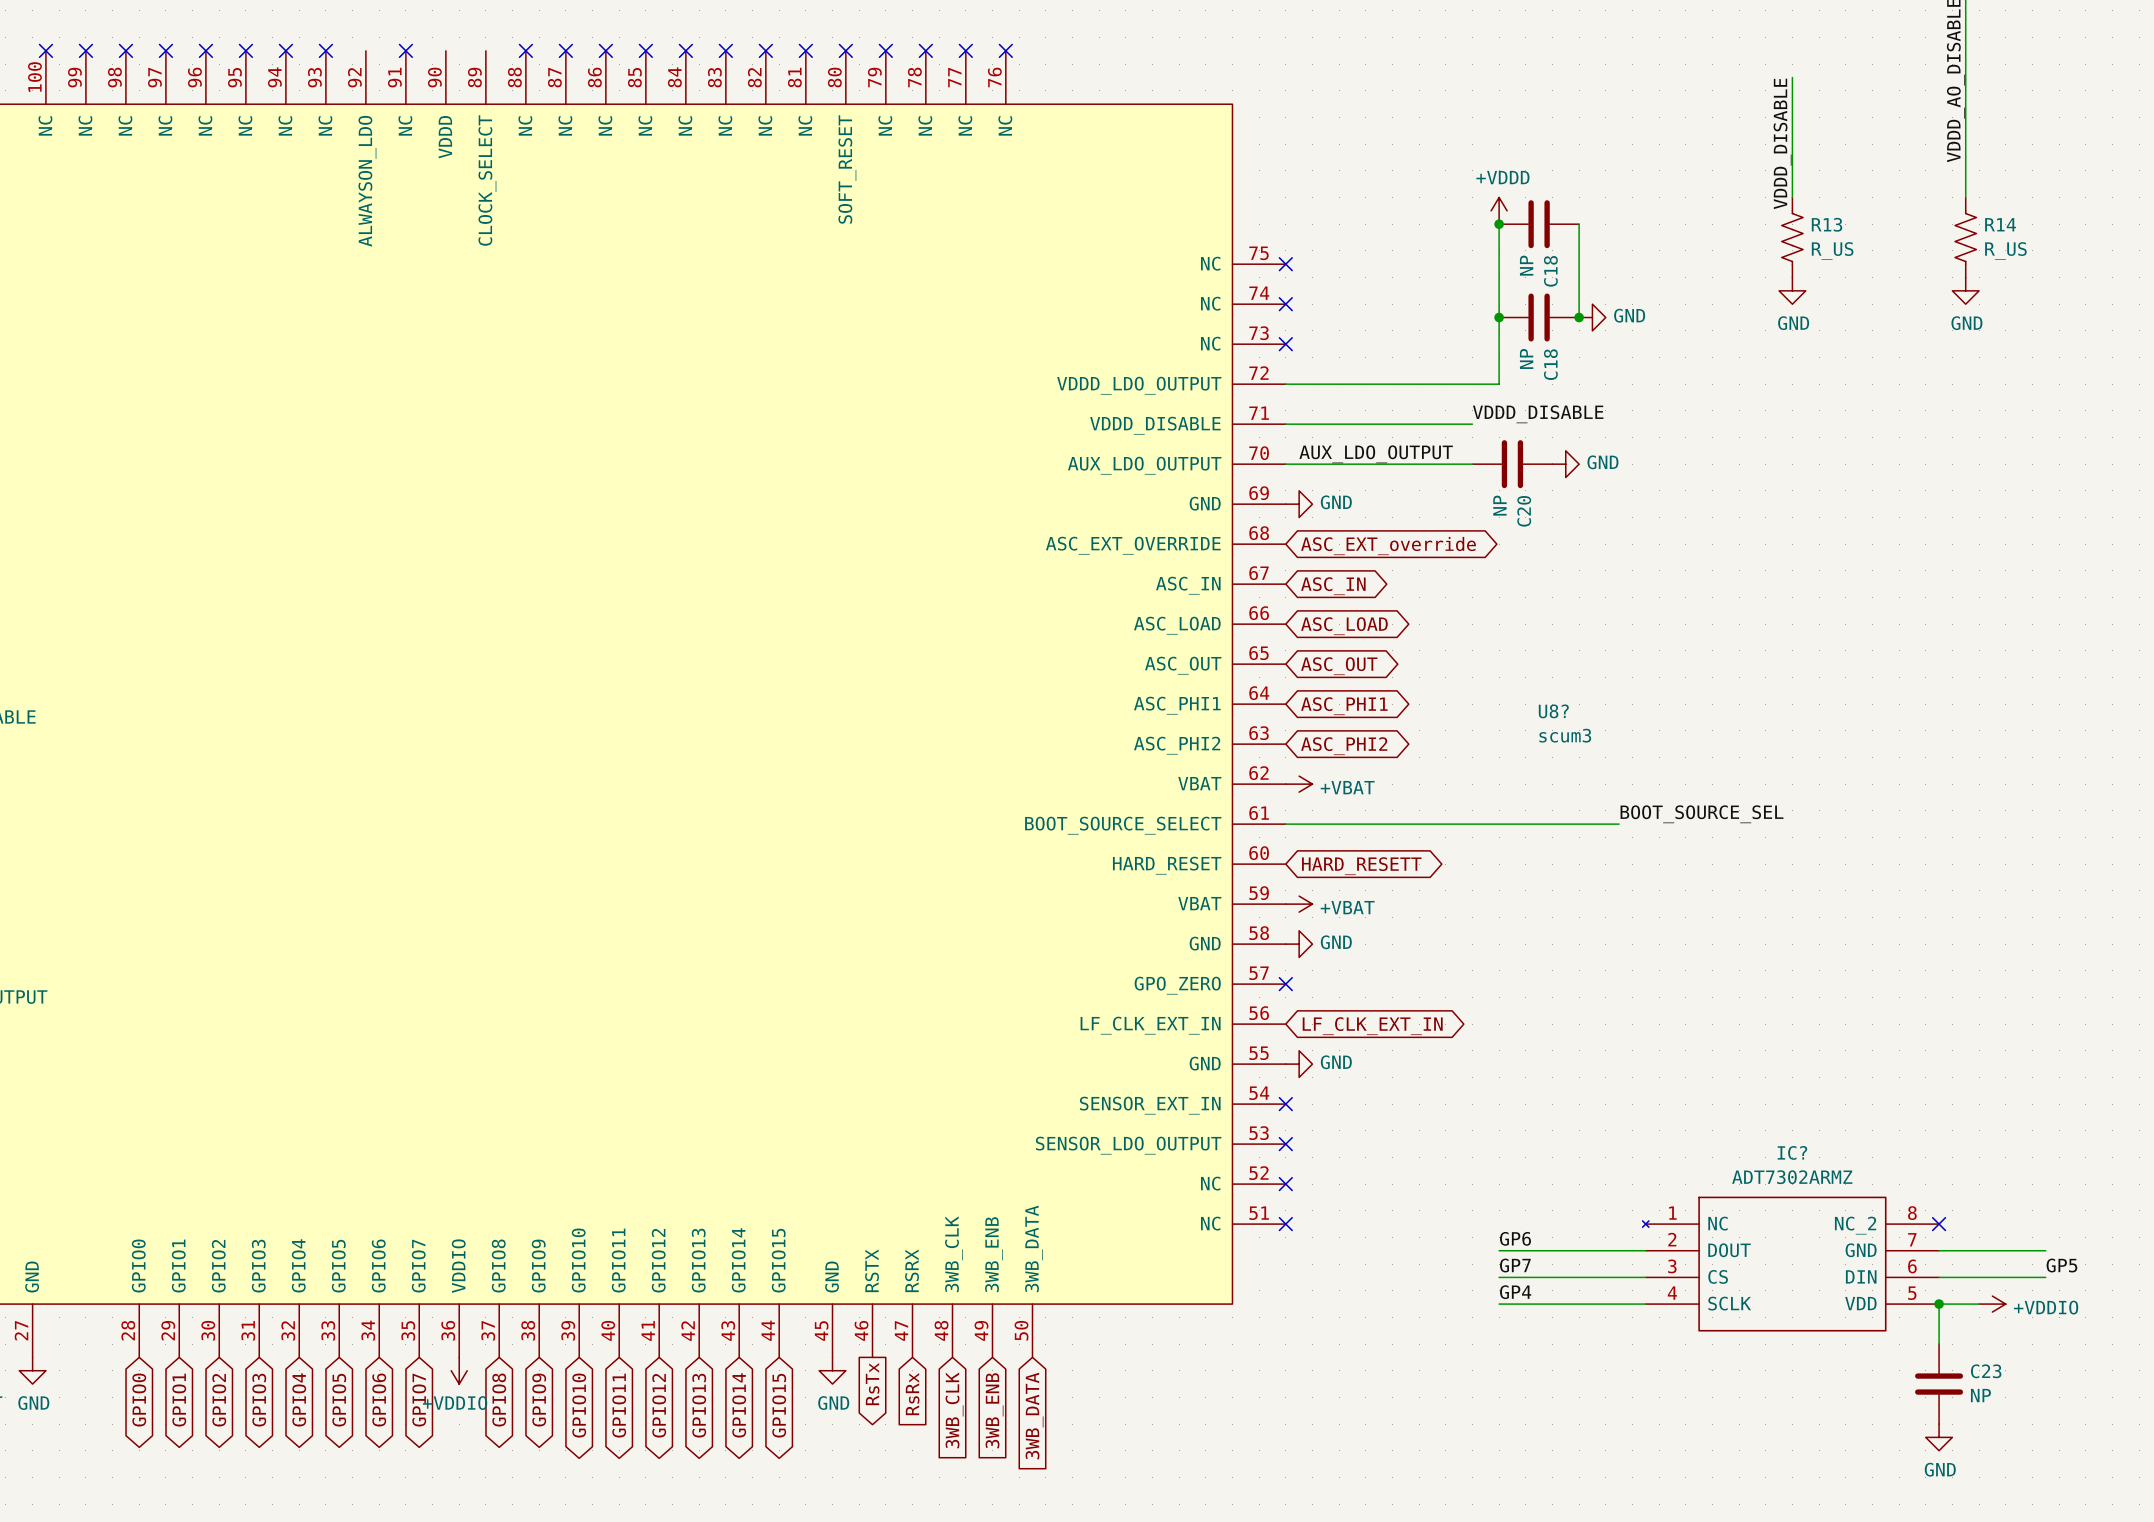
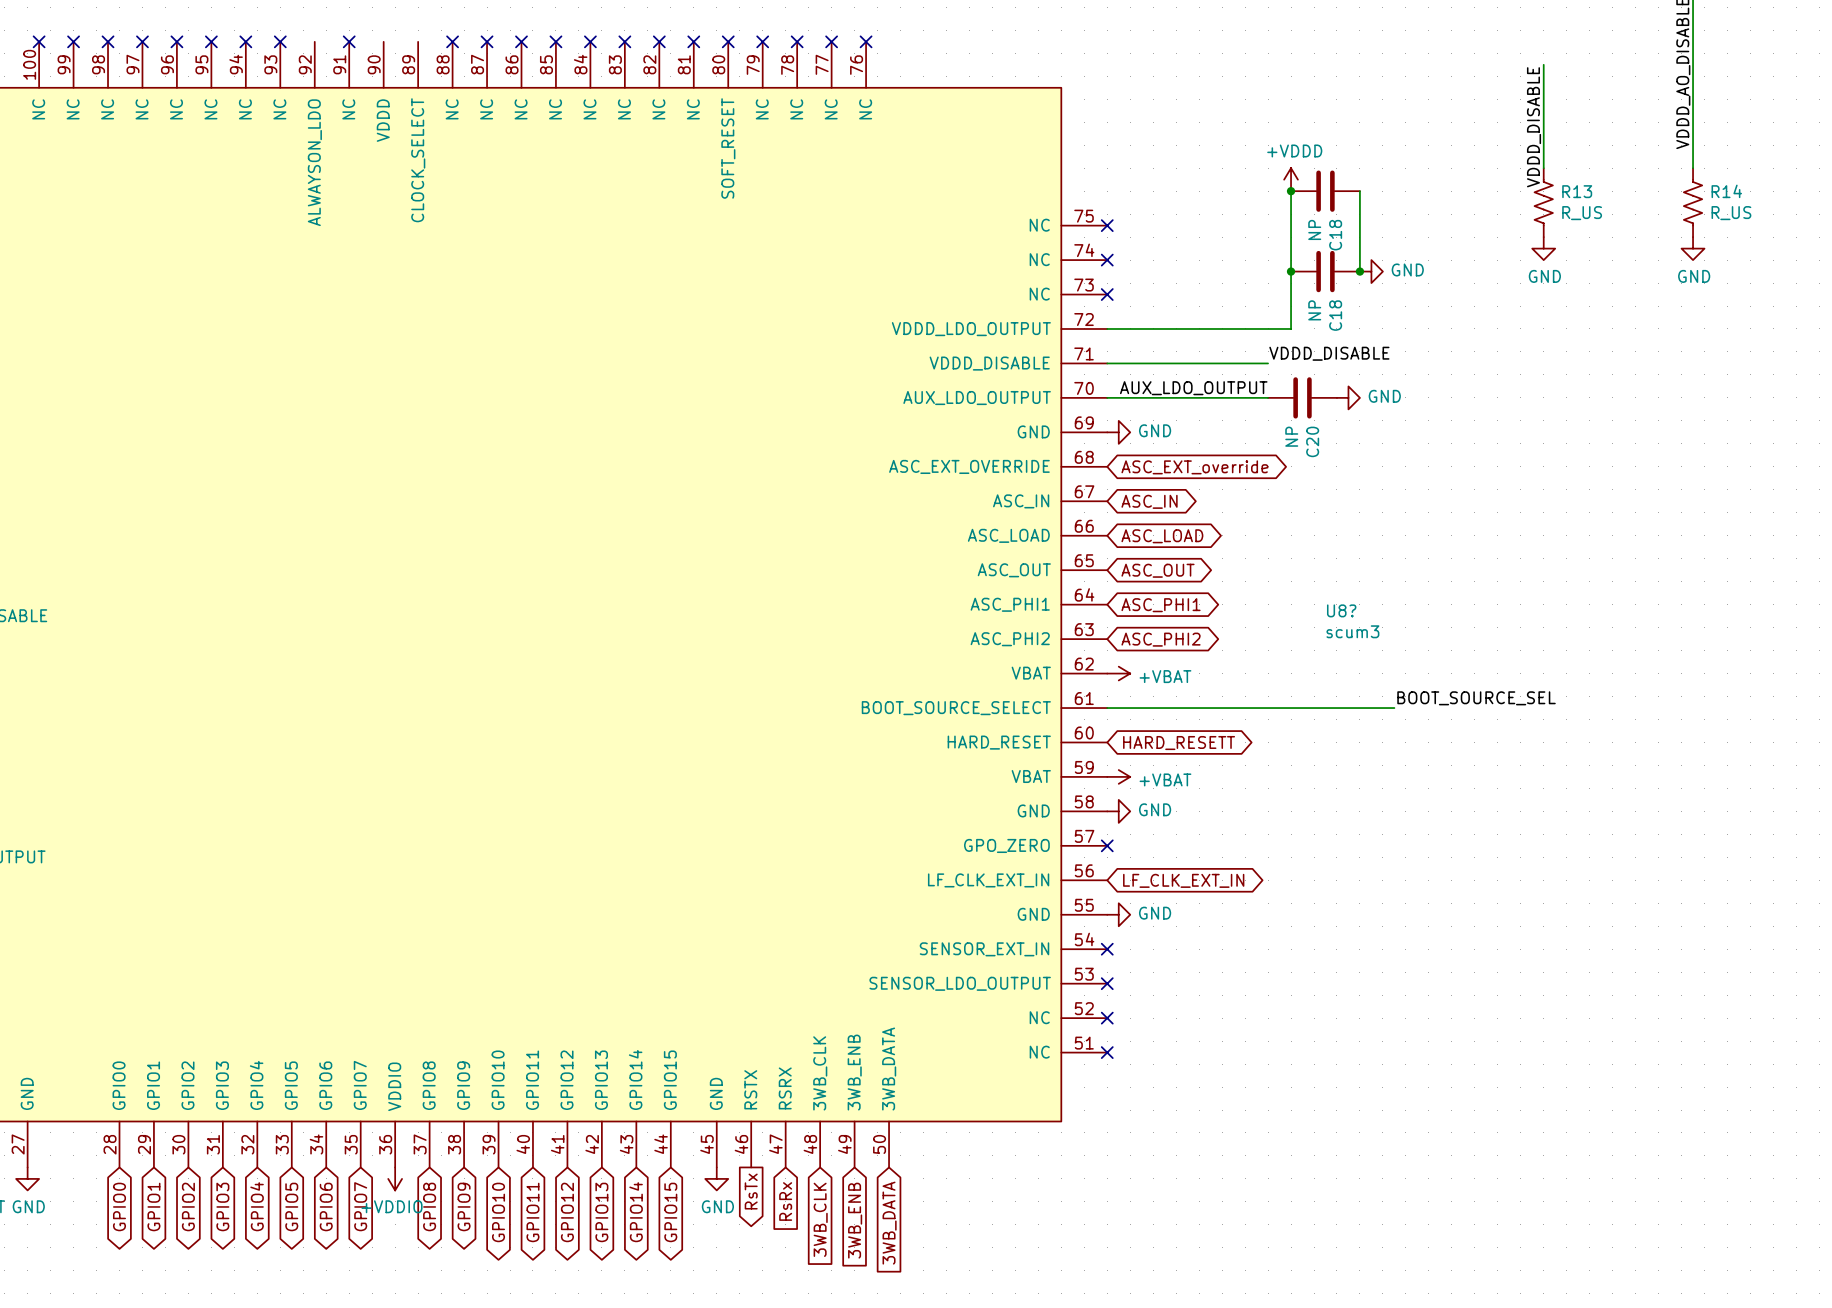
no-connect mark: (1939, 1224) -> none
label: GP6 (1515, 1238) -> none
wire: (1499, 1250) (1645, 1250) -> none
wire: (1939, 1250) (2045, 1250) -> none
IC?: ADT7302ARMZ (1790, 1264) -> none
label: GP7 (1515, 1265) -> none
label: GP5 (2061, 1265) -> none
wire: (1499, 1277) (1645, 1277) -> none
wire: (1939, 1277) (2045, 1277) -> none
label: GP4 (1515, 1292) -> none
wire: (1499, 1304) (1645, 1304) -> none
junction: (1939, 1304) -> none
wire: (1979, 1304) (1939, 1304) (1939, 1344) -> none
power symbol: +VDDIO (1992, 1304) -> none
C23: NP (1939, 1384) -> none
power symbol: GND (1939, 1437) -> none

